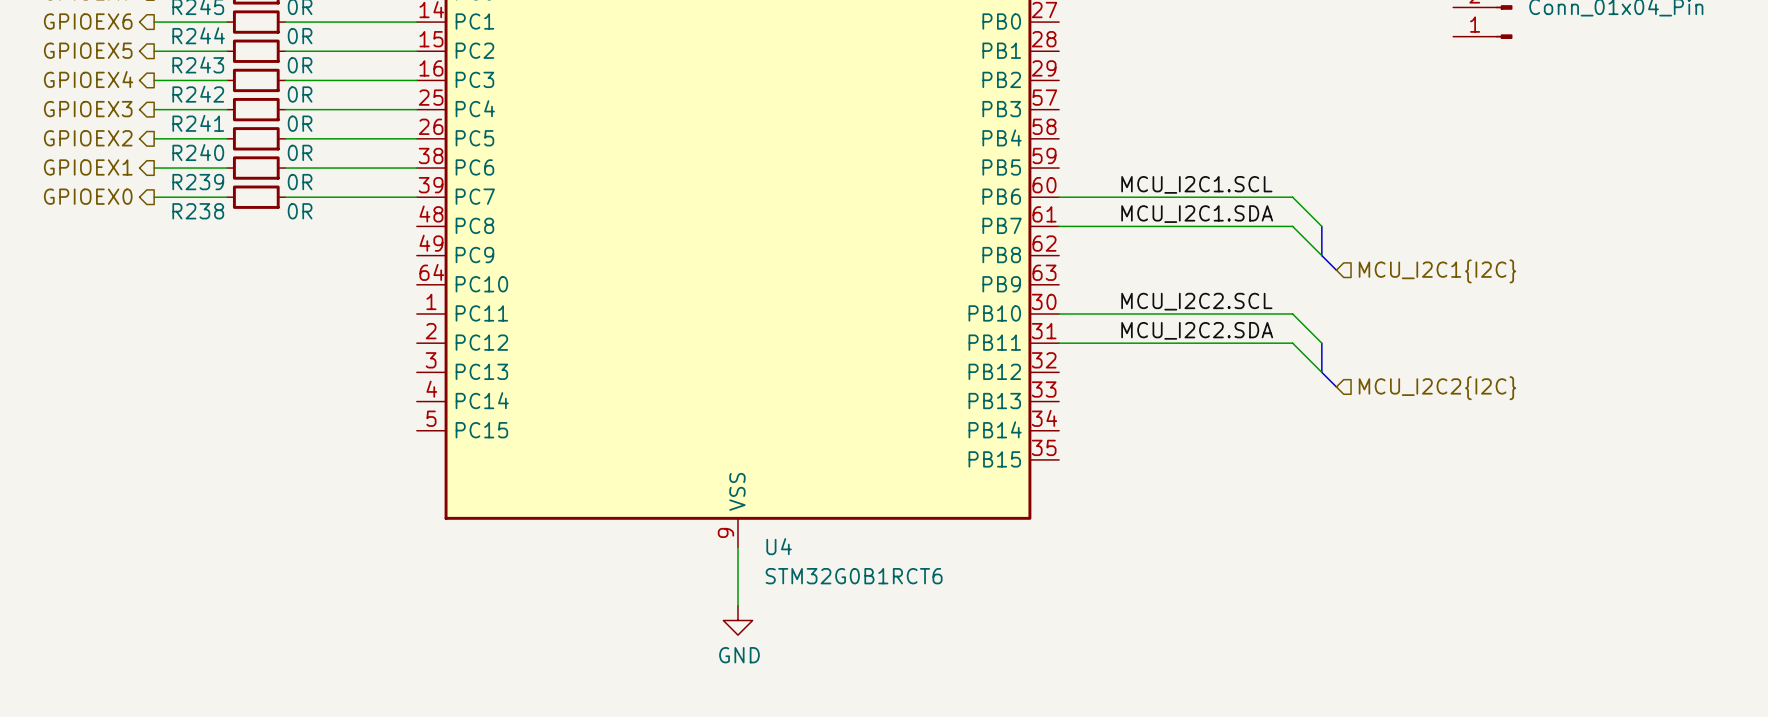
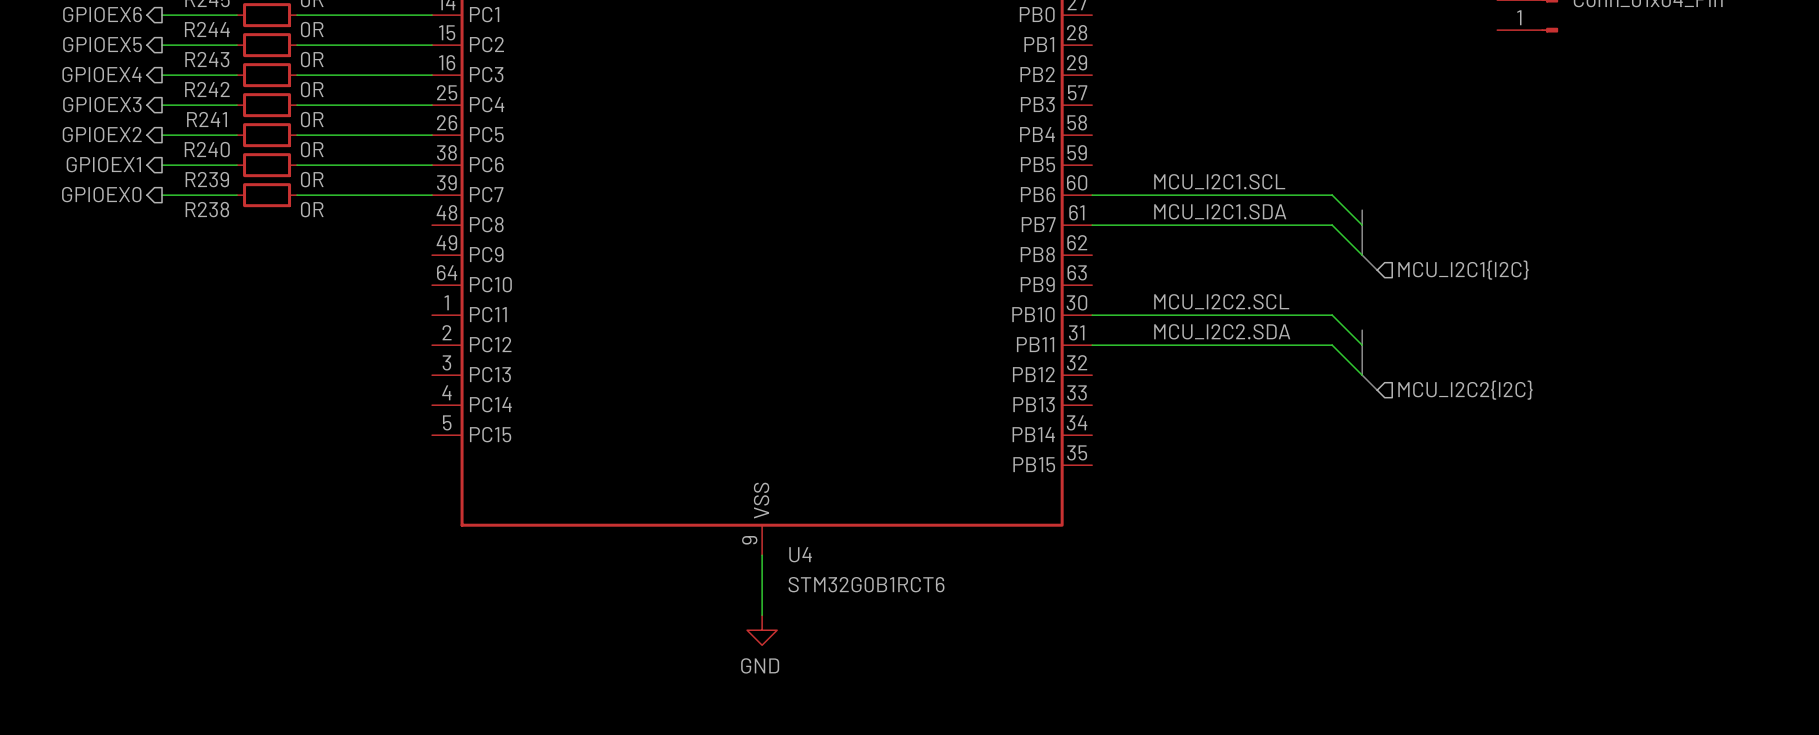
bus: none -> (1362, 210) (1362, 225)
bus: none -> (1362, 330) (1362, 345)

